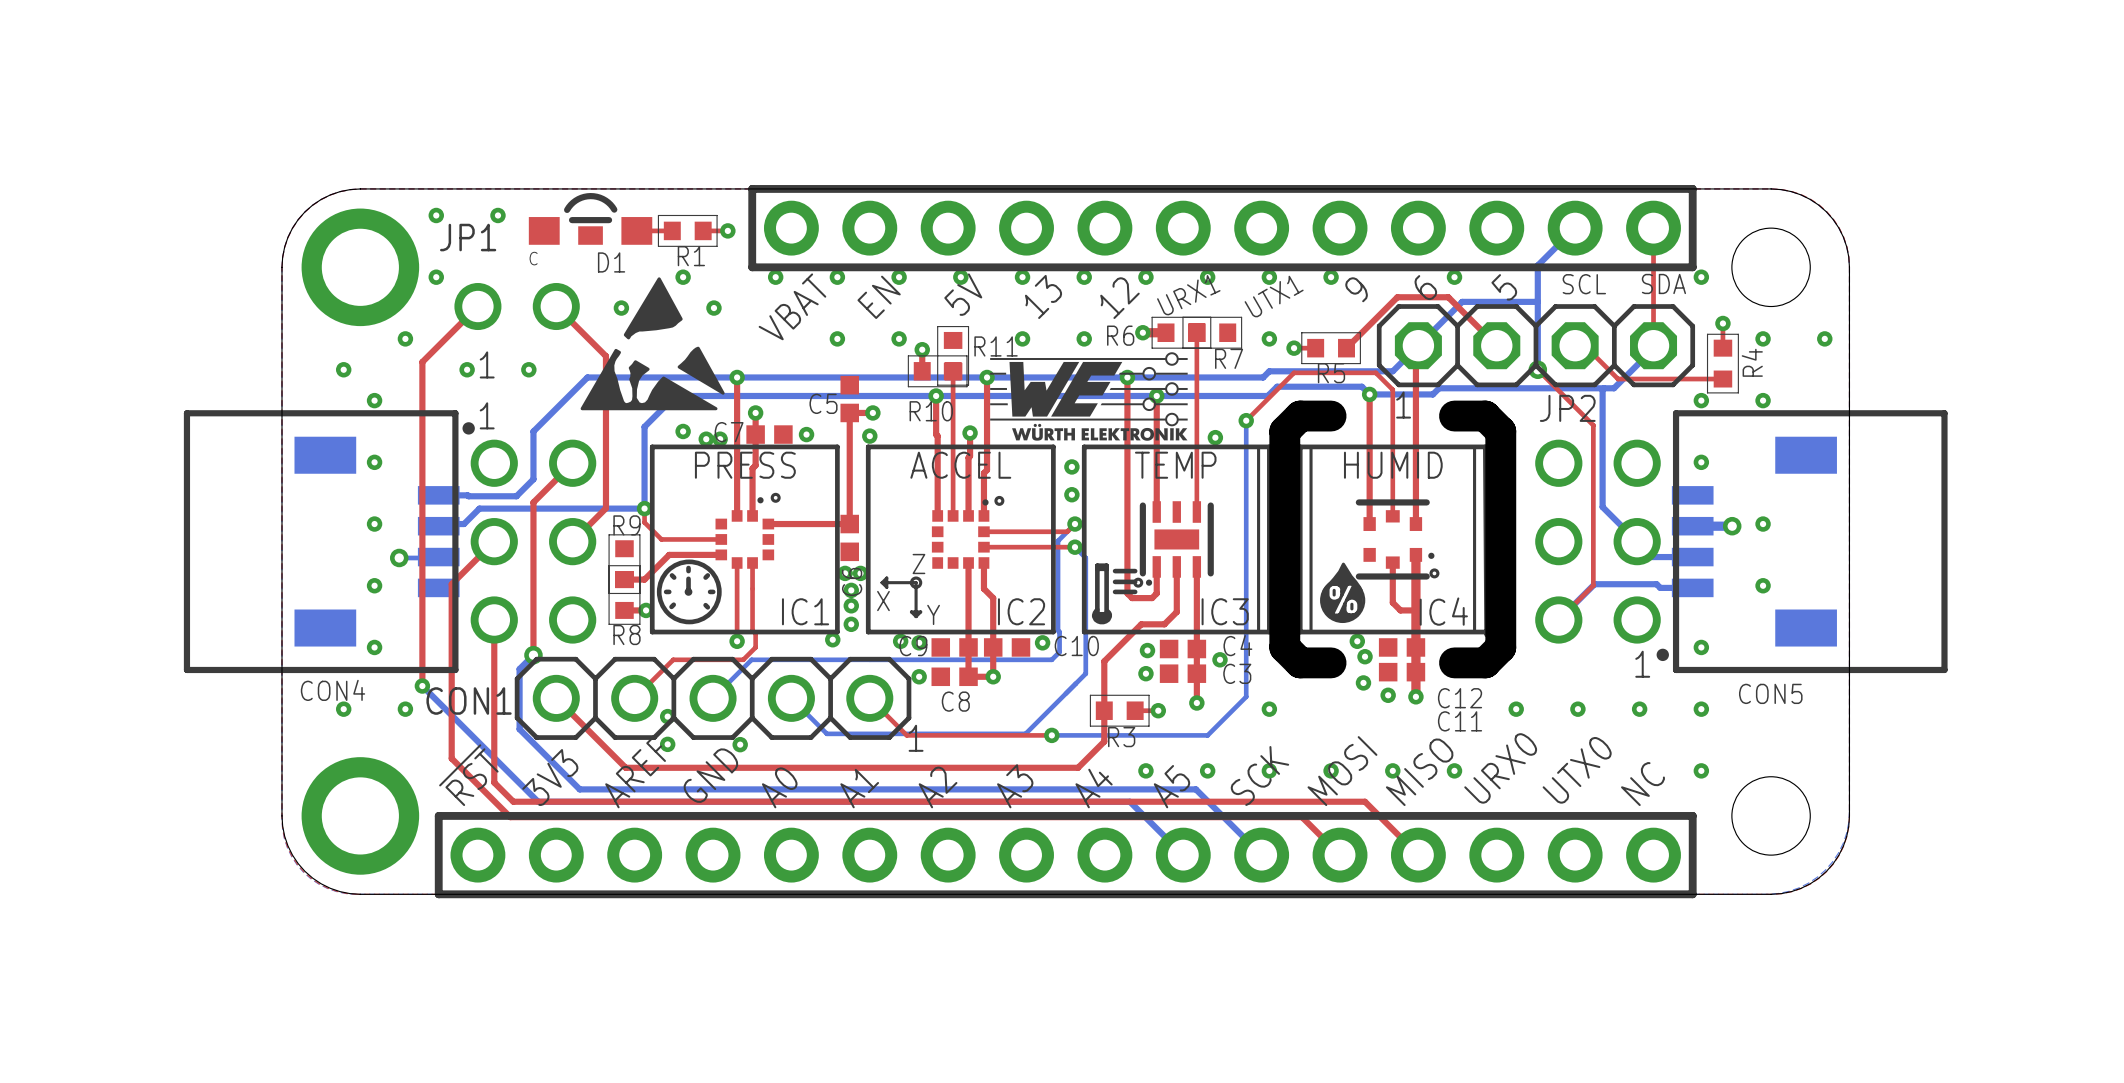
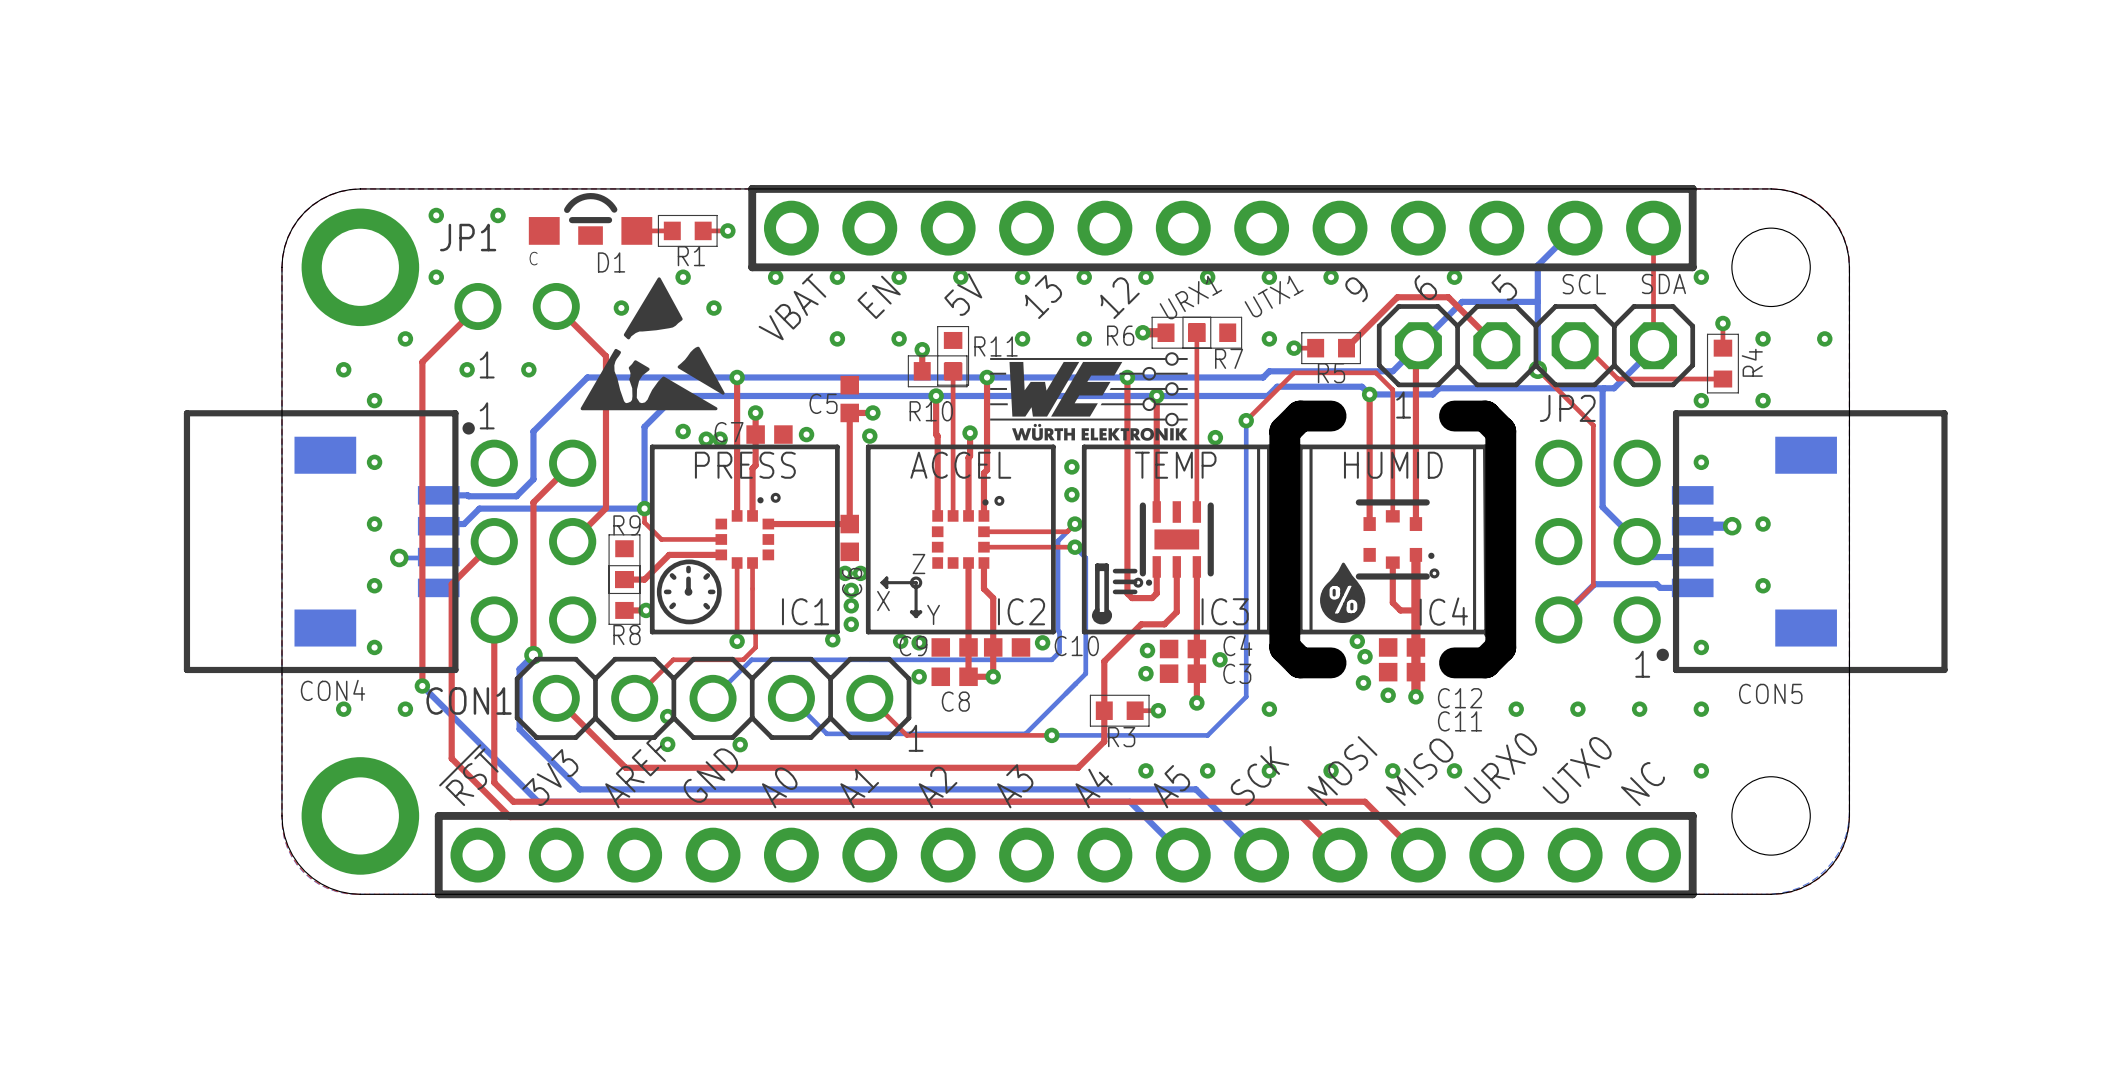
text rotation: 0° (1188, 295) -> 5° counterclockwise (1190, 297)

